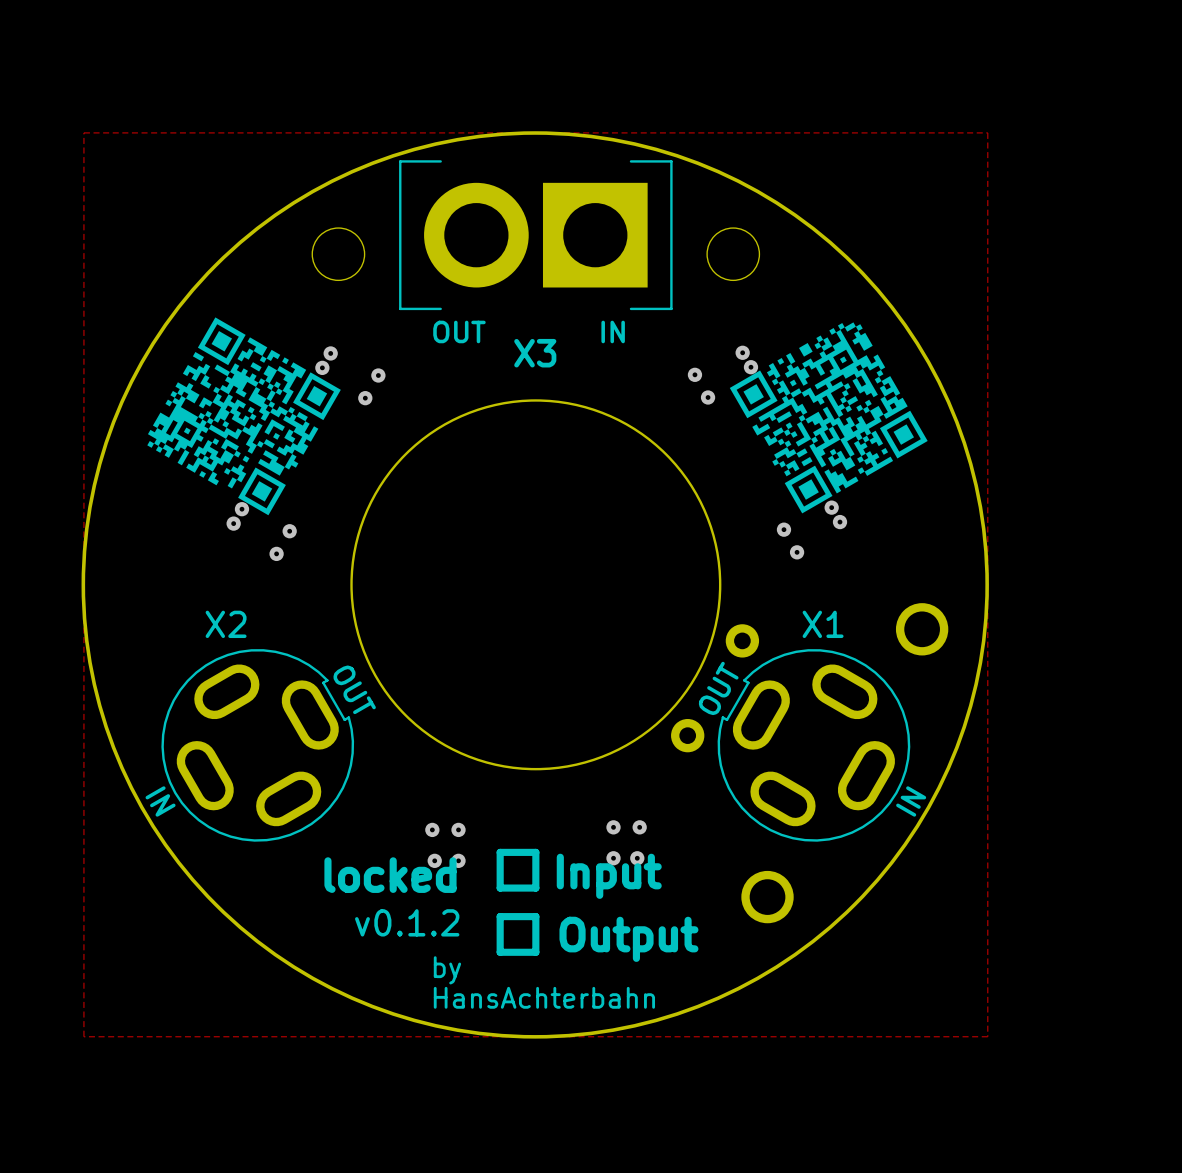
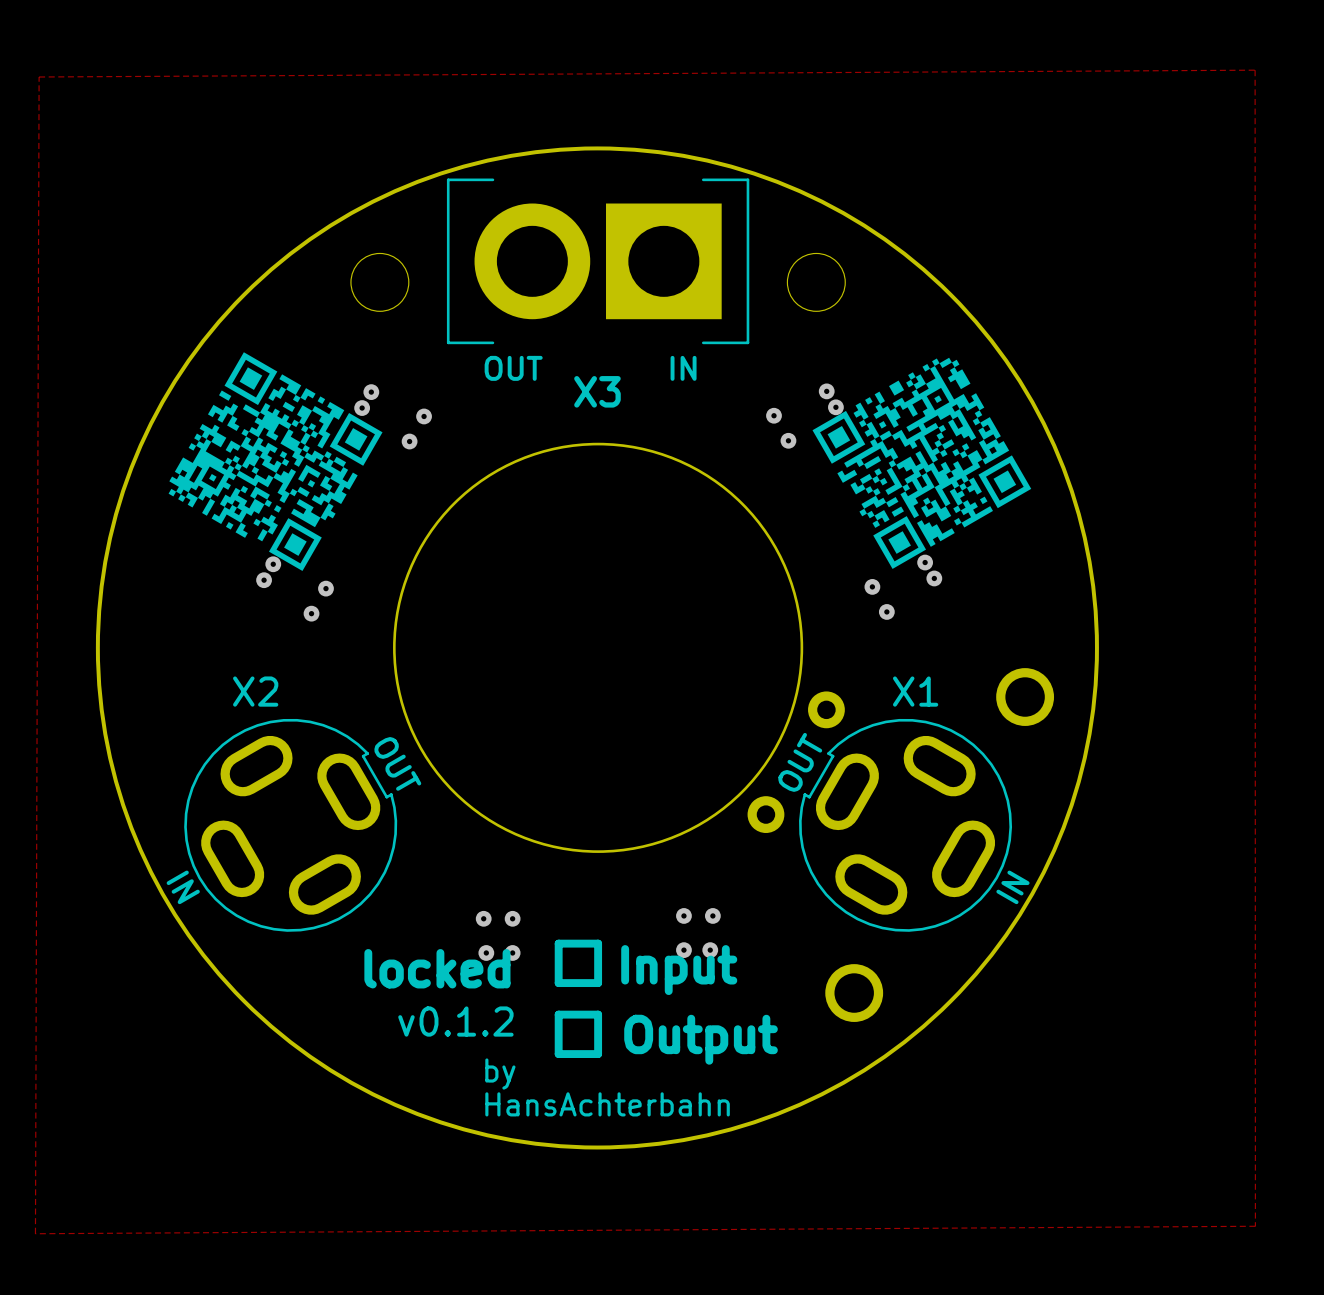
zone outline: (83, 132) (83, 1036) (987, 1036) (987, 132) (83, 132) -> (1255, 70) (39, 77) (35, 1233) (1255, 1226) (1255, 70)

